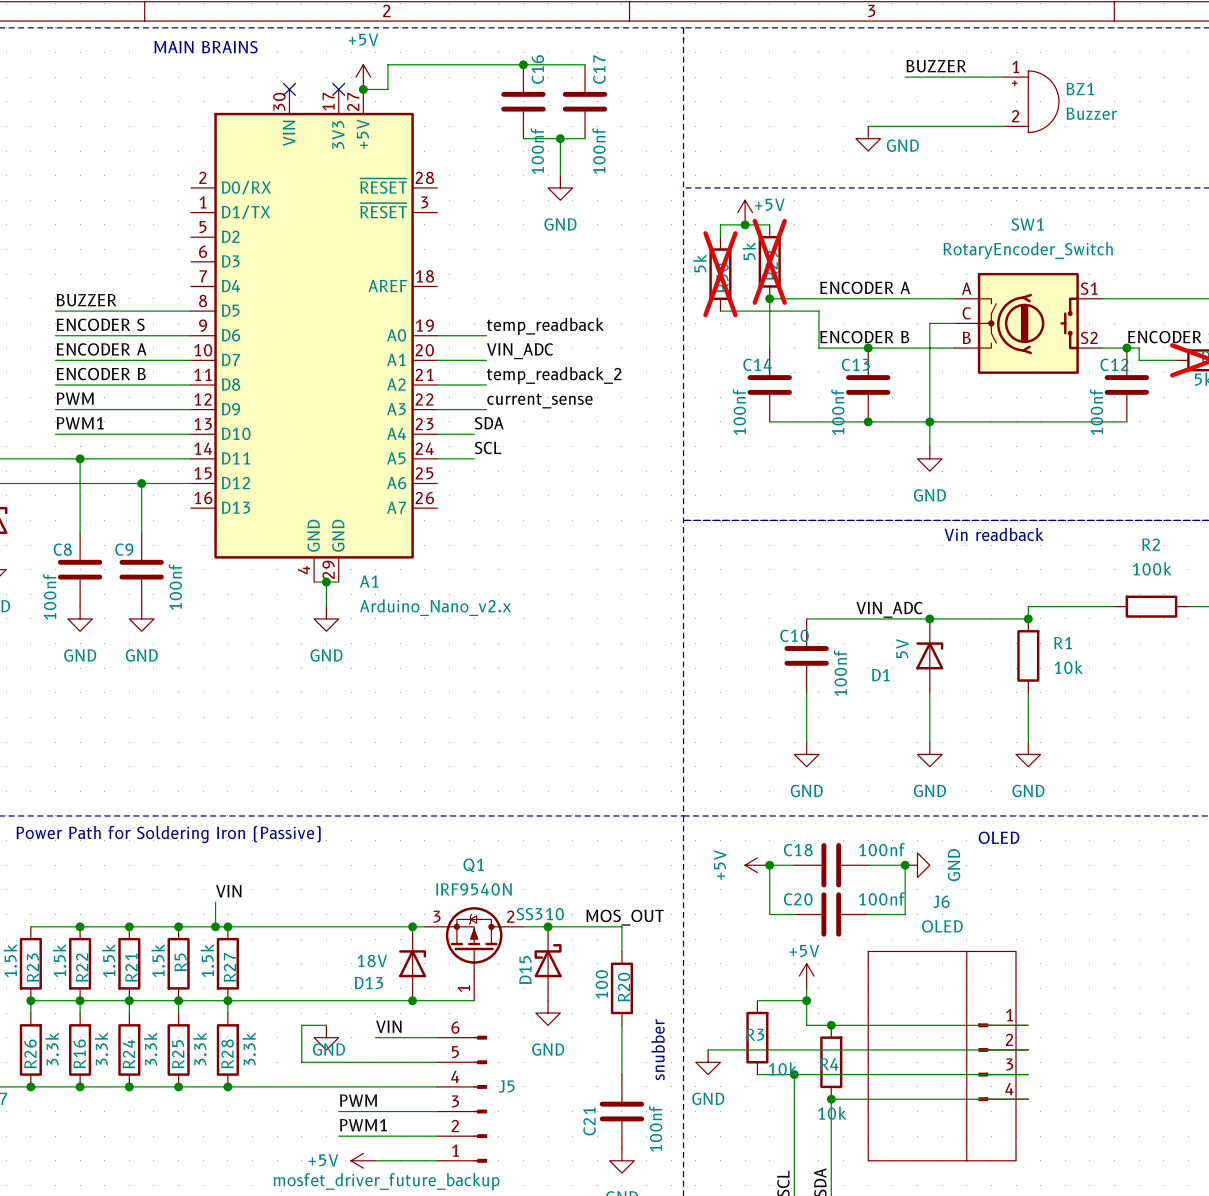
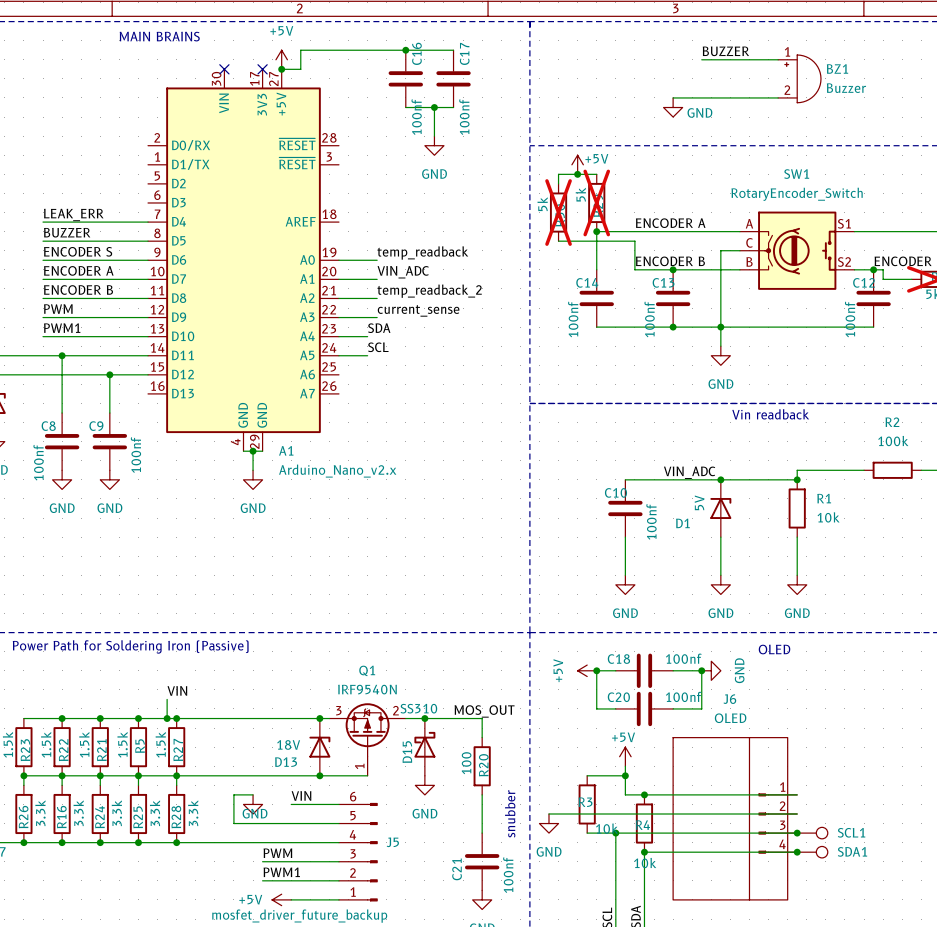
label: none -> LEAK_ERR (73, 214)
wire: none -> (43, 222) (148, 222)
junction: none -> (797, 833)
SCL1: none -> (812, 833)
junction: none -> (797, 852)
SDA1: none -> (812, 852)

